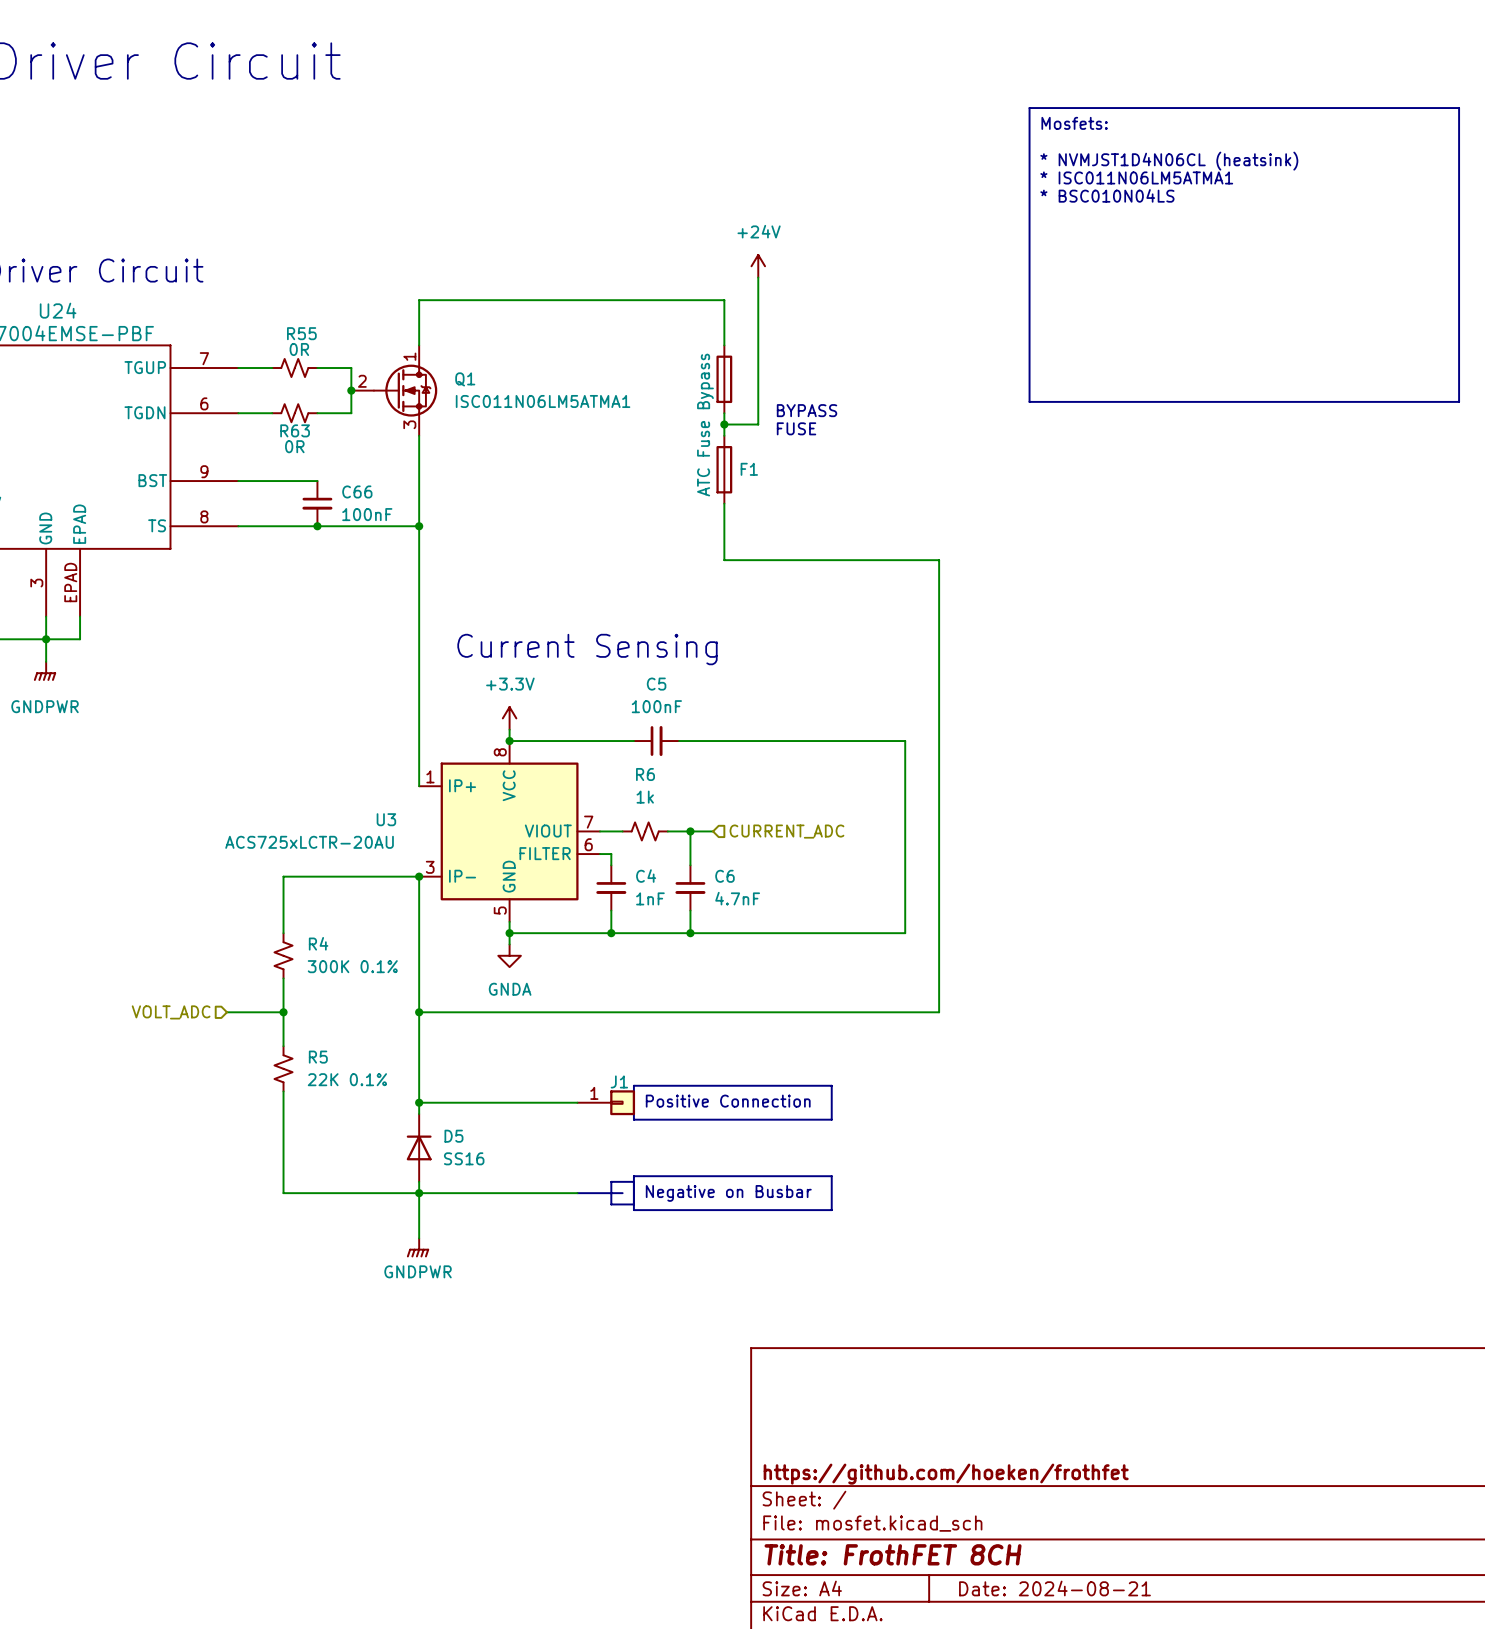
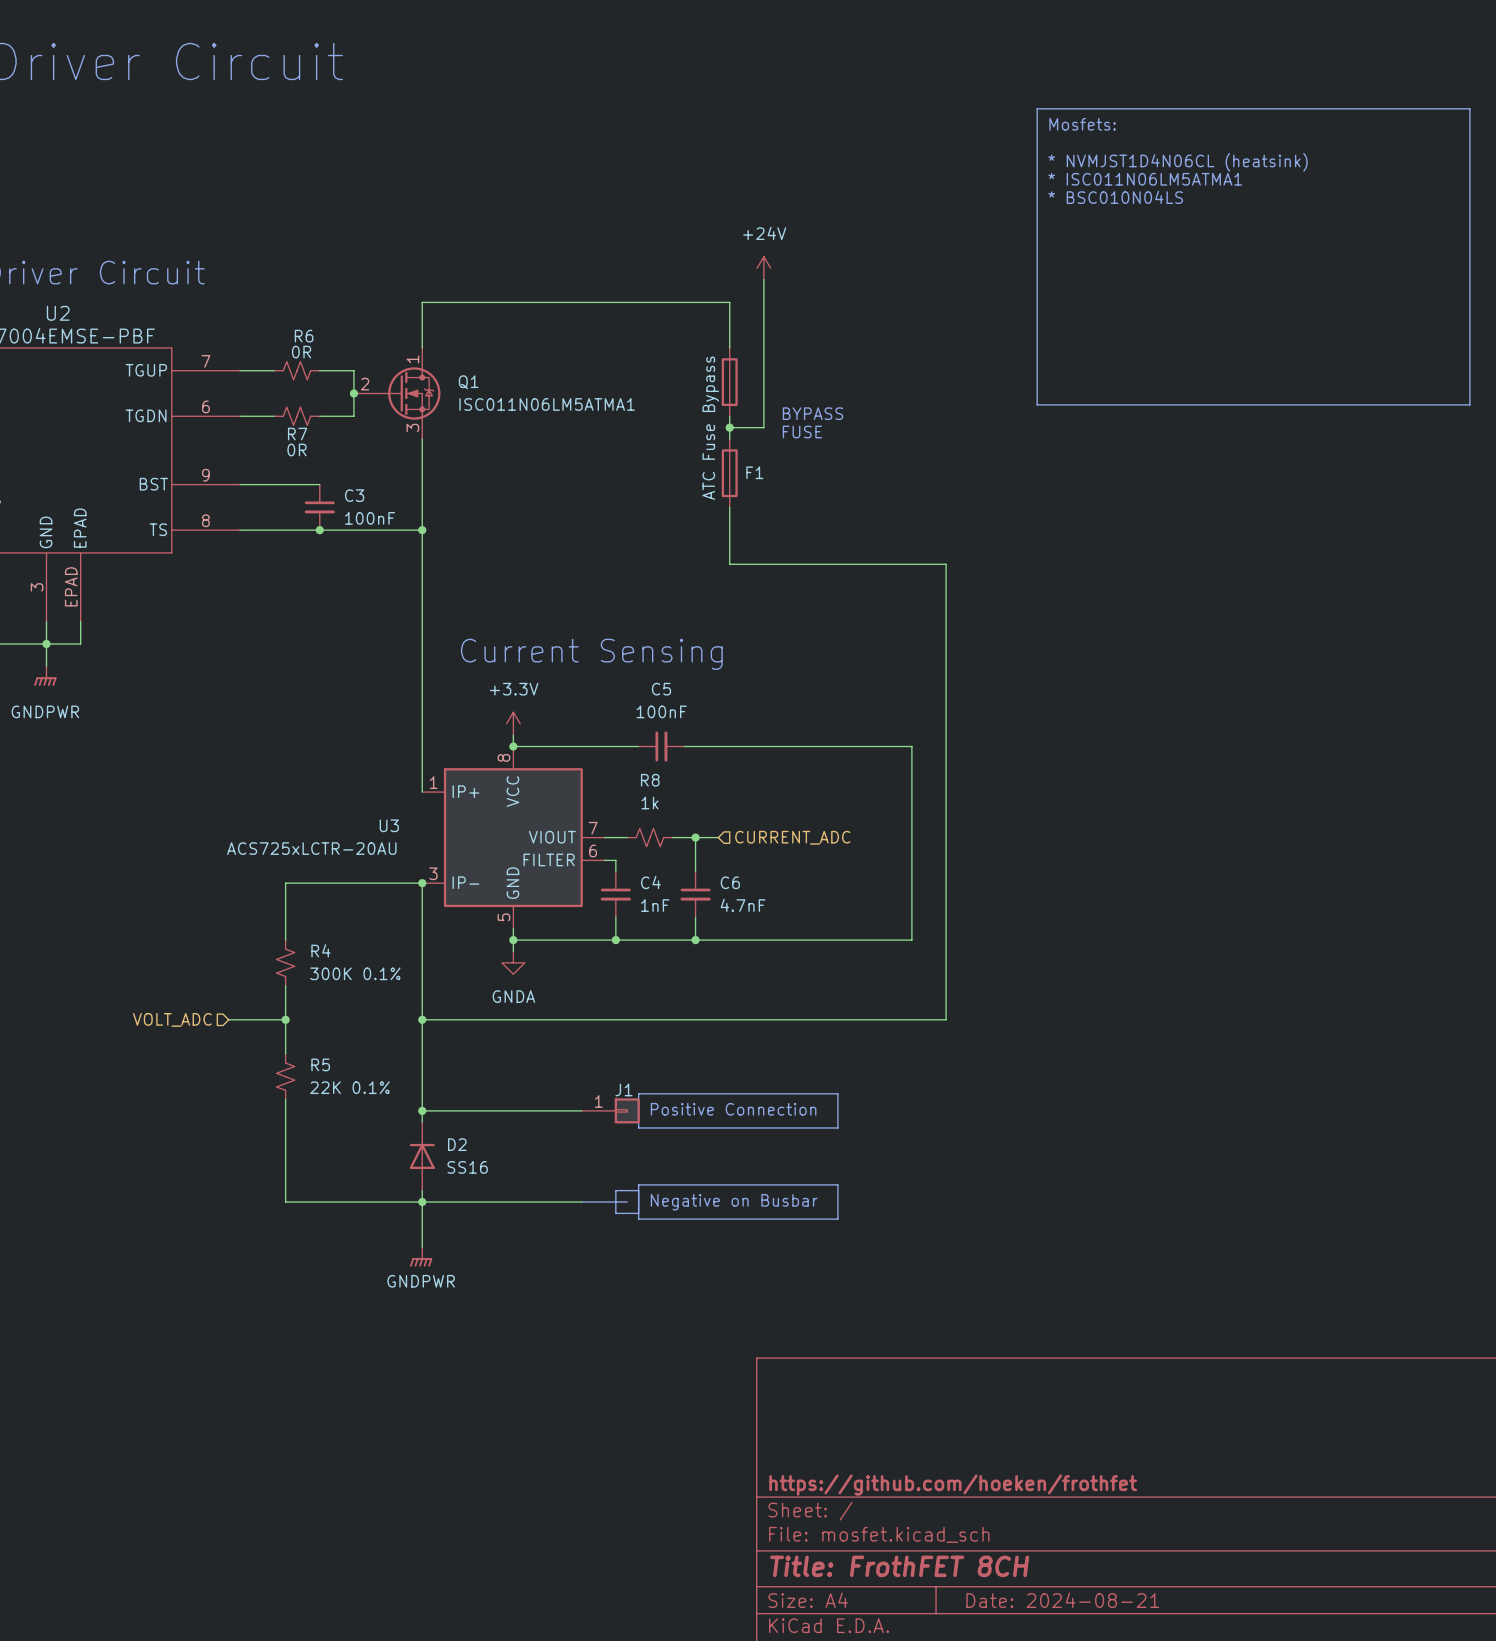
U24 name: U24 (58, 310) -> U2 (58, 313)
R55 name: R55 (301, 333) -> R6 (304, 336)
R63 name: R63 (295, 430) -> R7 (297, 434)
C66 name: C66 (357, 491) -> C3 (354, 495)
R6 name: R6 (645, 774) -> R8 (650, 780)
D5 name: D5 (453, 1136) -> D2 (457, 1144)

